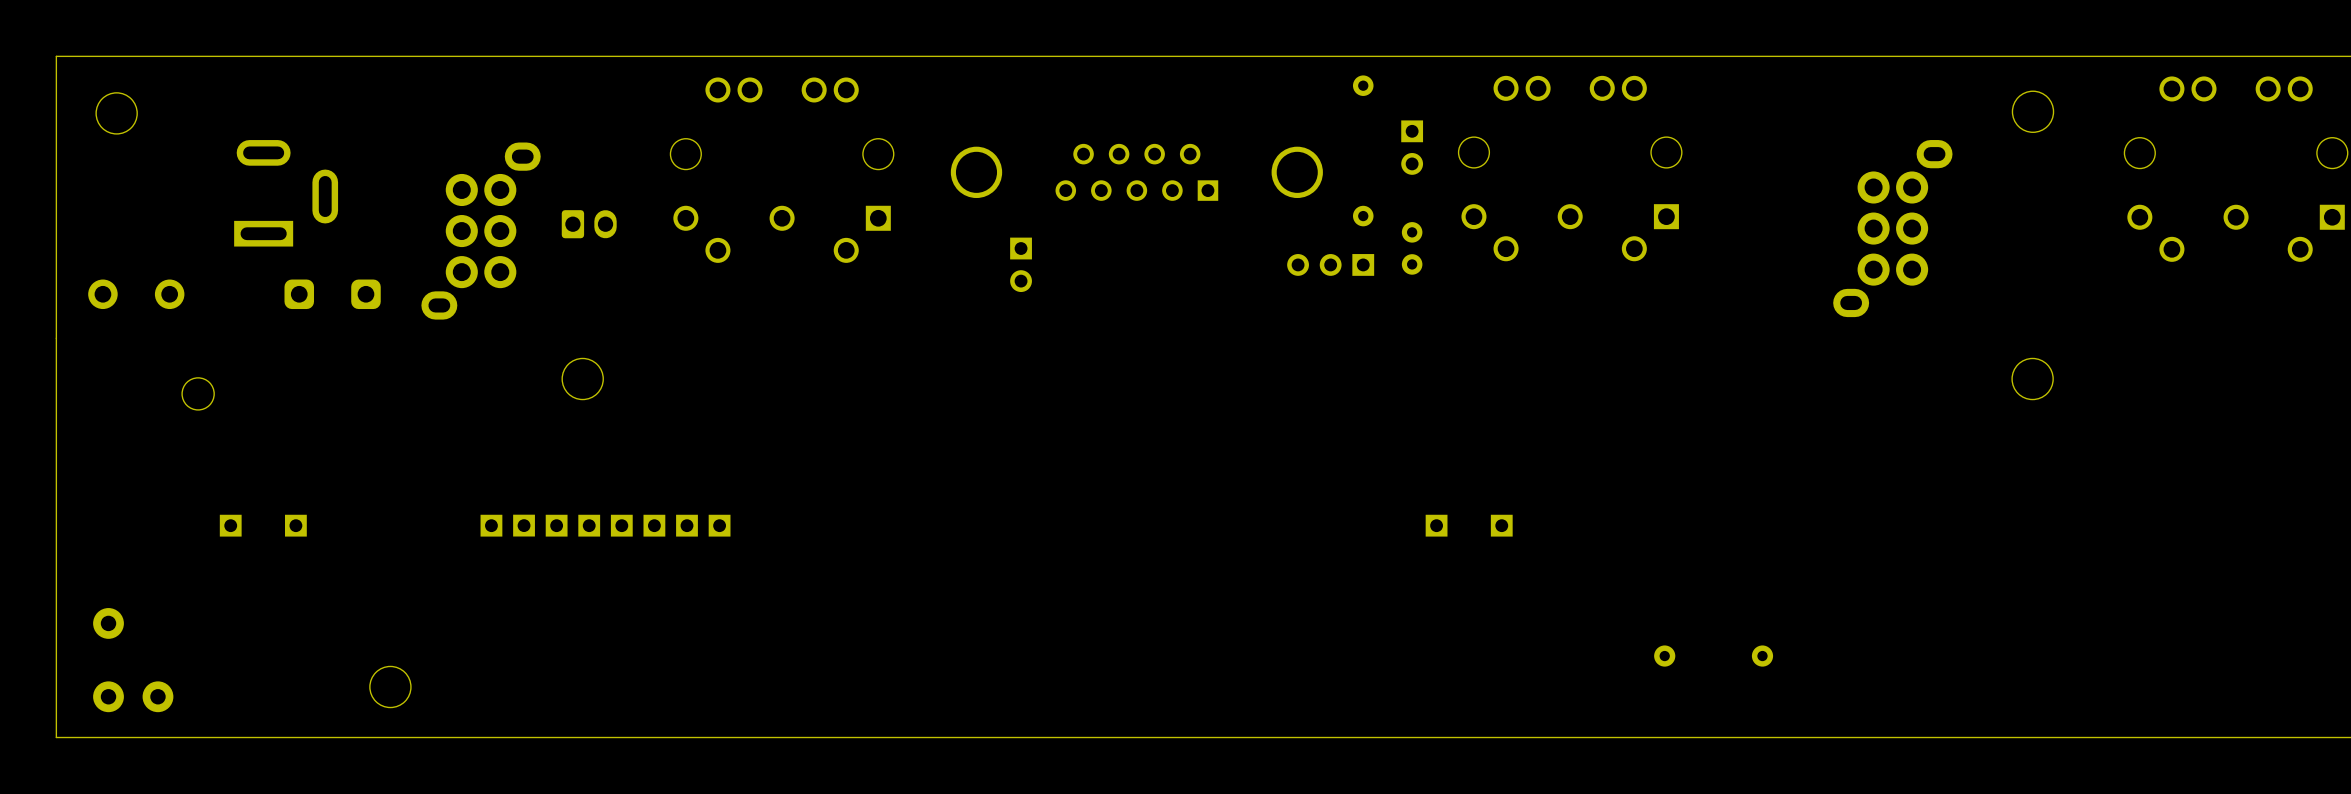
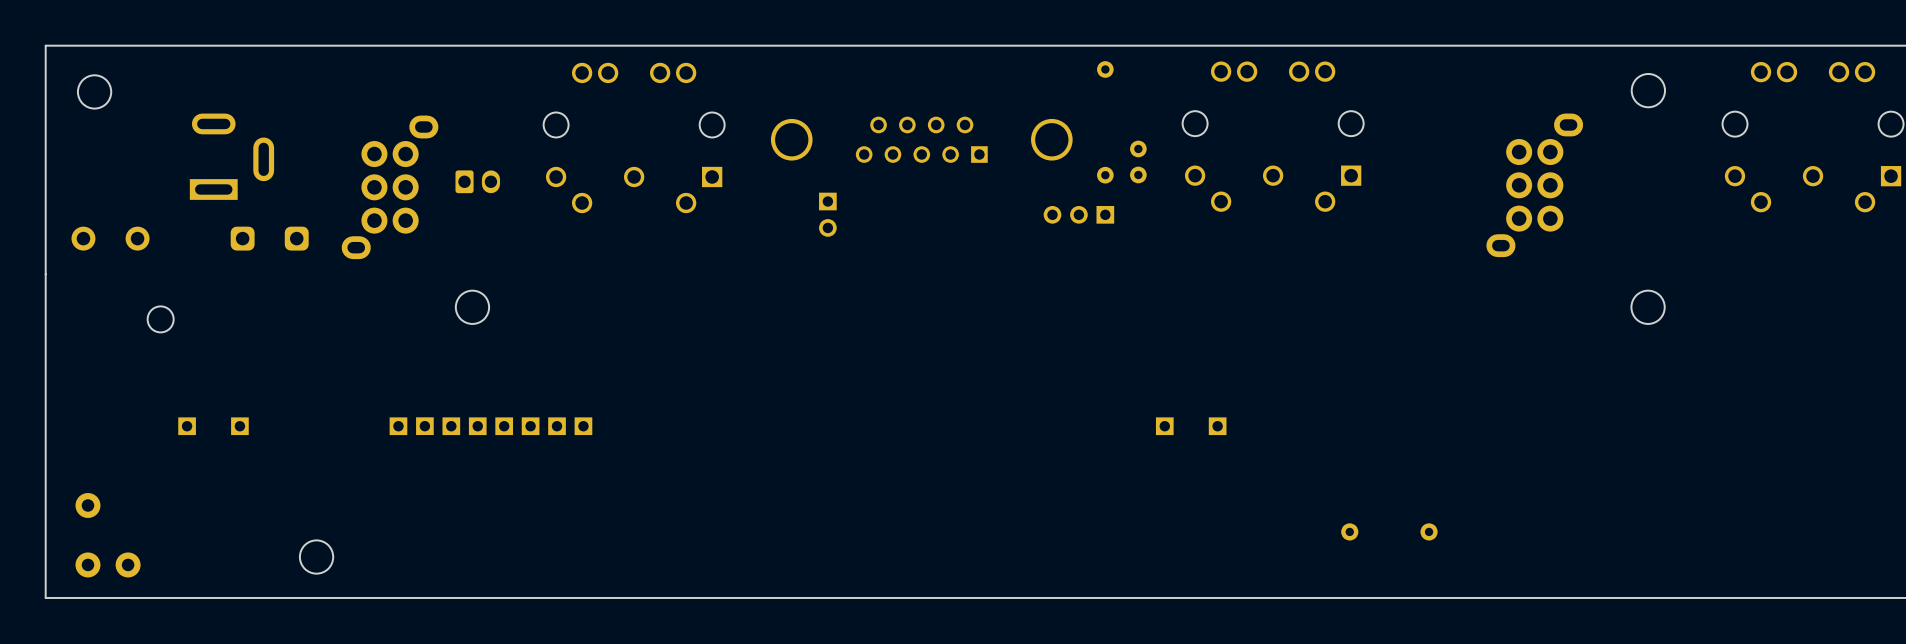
part: (1412, 147) -> none
part position: (1412, 248) -> (1138, 161)

